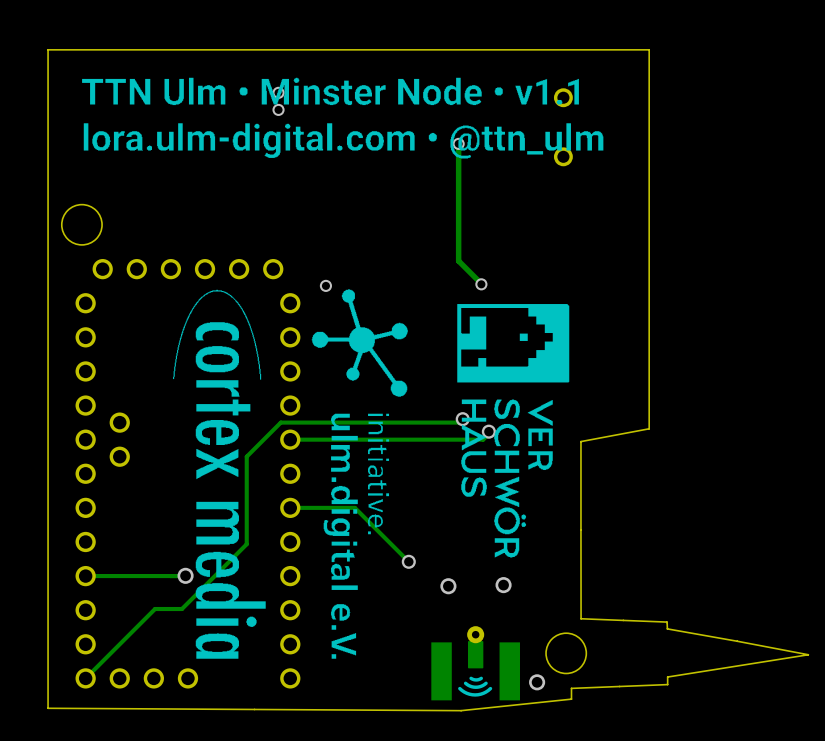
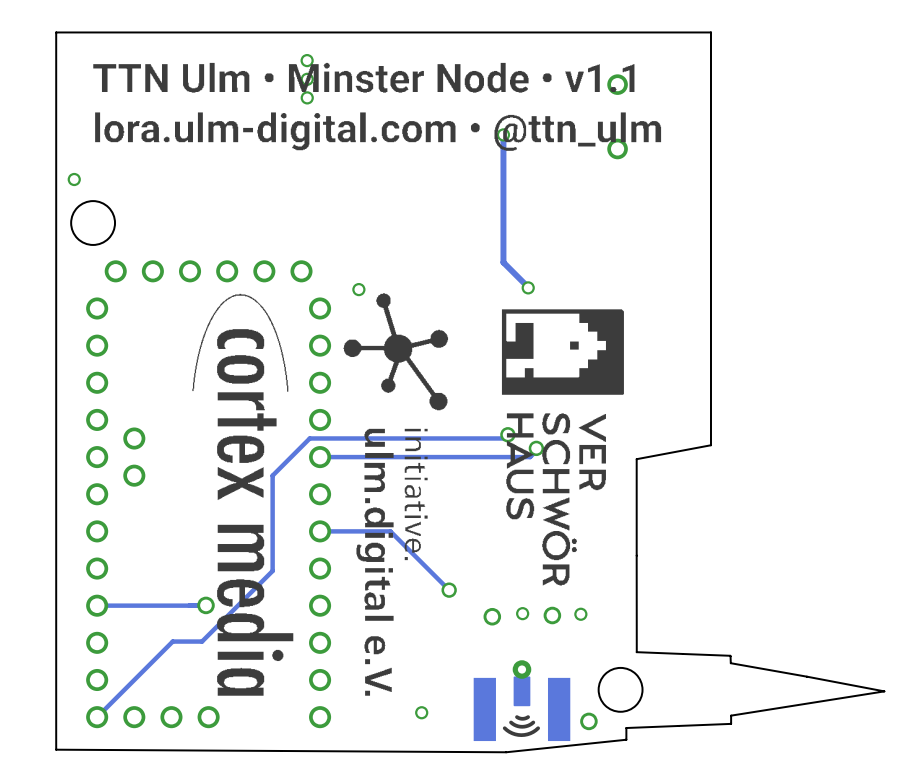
via: none -> (307, 60)
via: none -> (74, 179)
via: none -> (522, 613)
via: none -> (580, 614)
via: none -> (421, 712)

